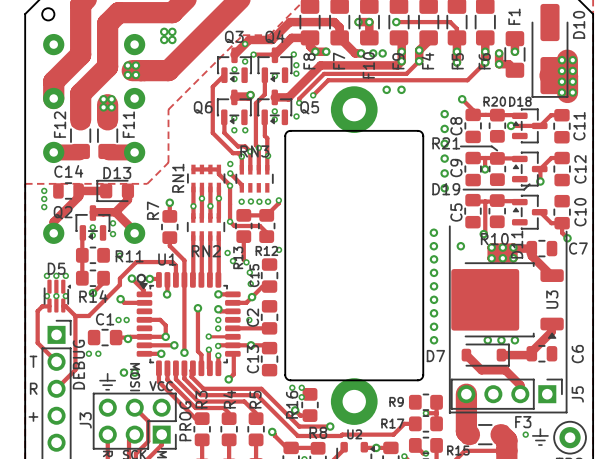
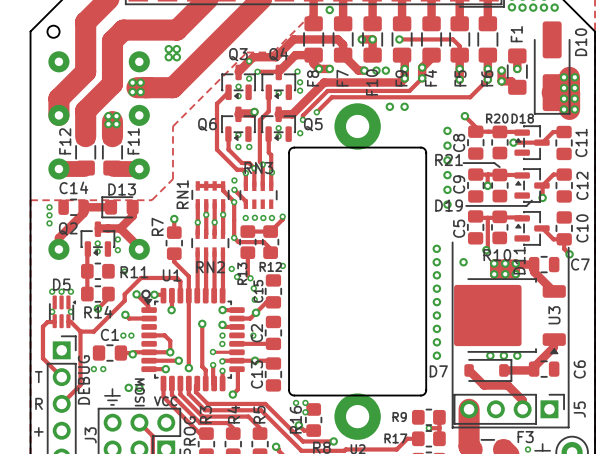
via: (56, 296) -> none

